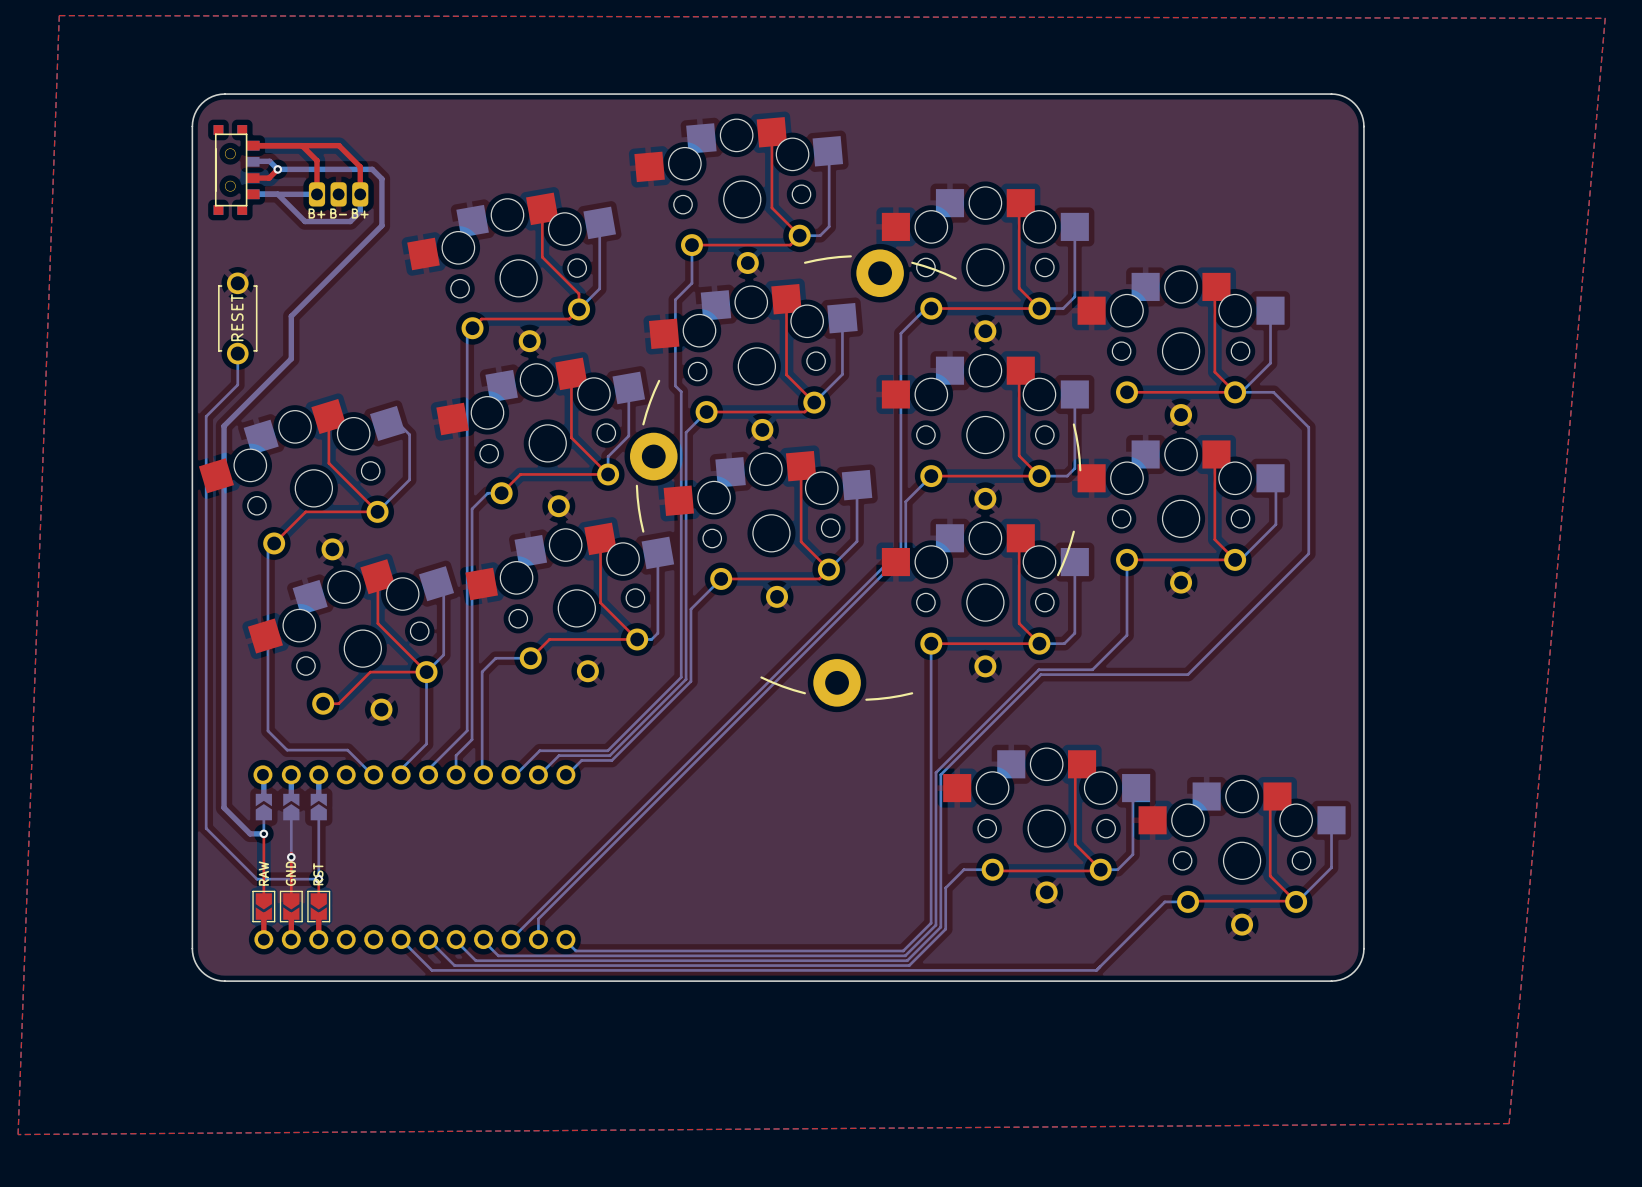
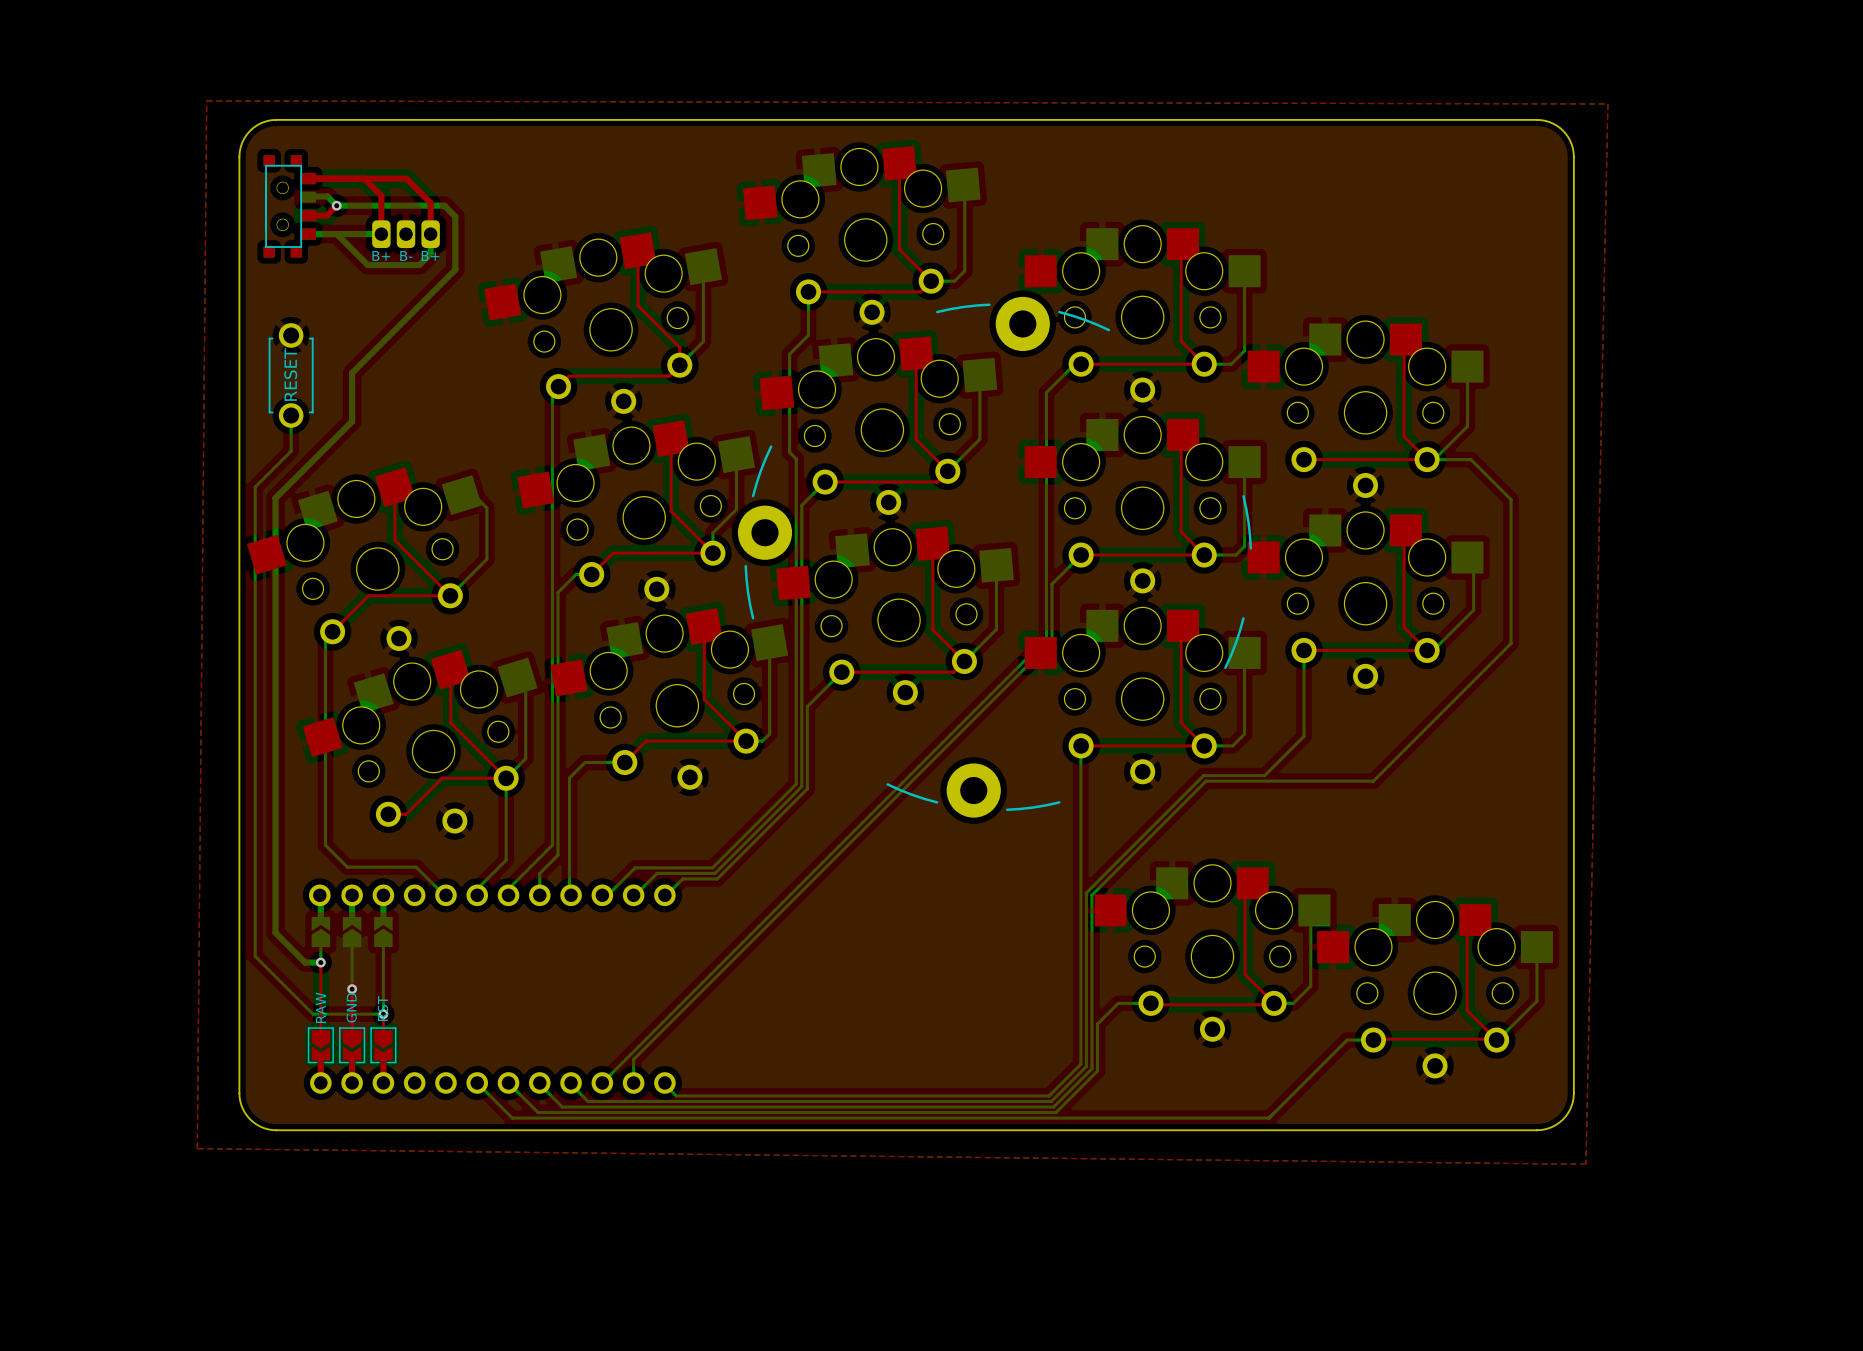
top zone outline: (59, 15) (18, 1134) (1509, 1123) (1605, 18) (59, 15) -> (206, 100) (197, 1148) (1585, 1164) (1607, 104) (206, 100)

